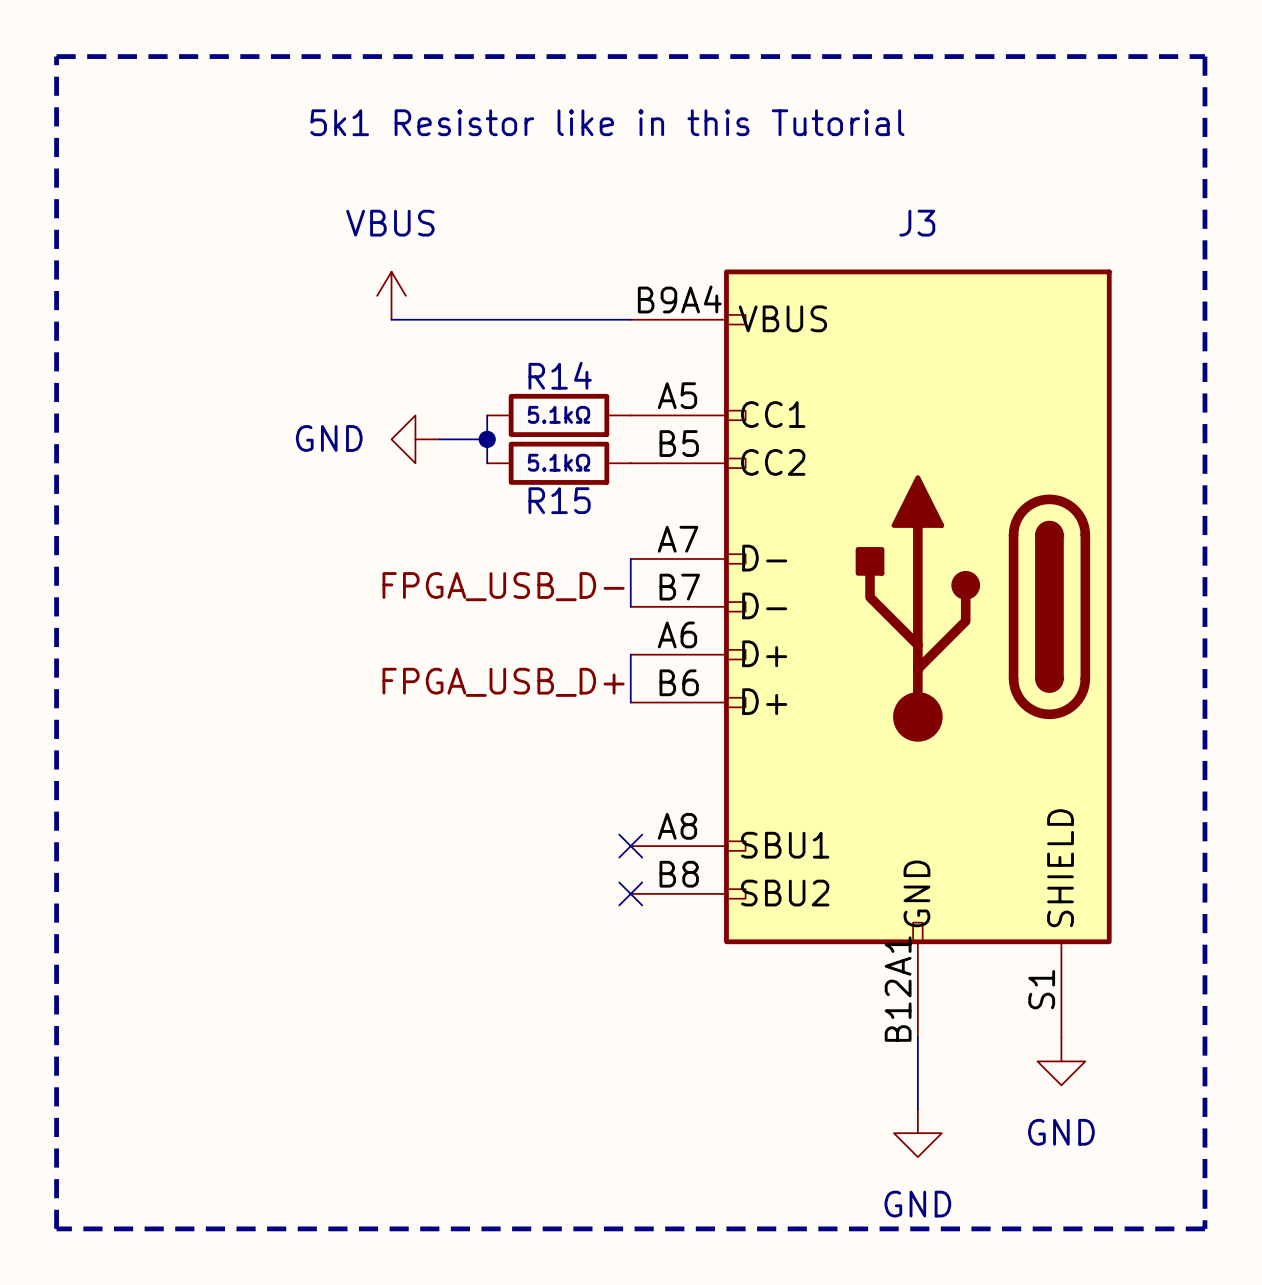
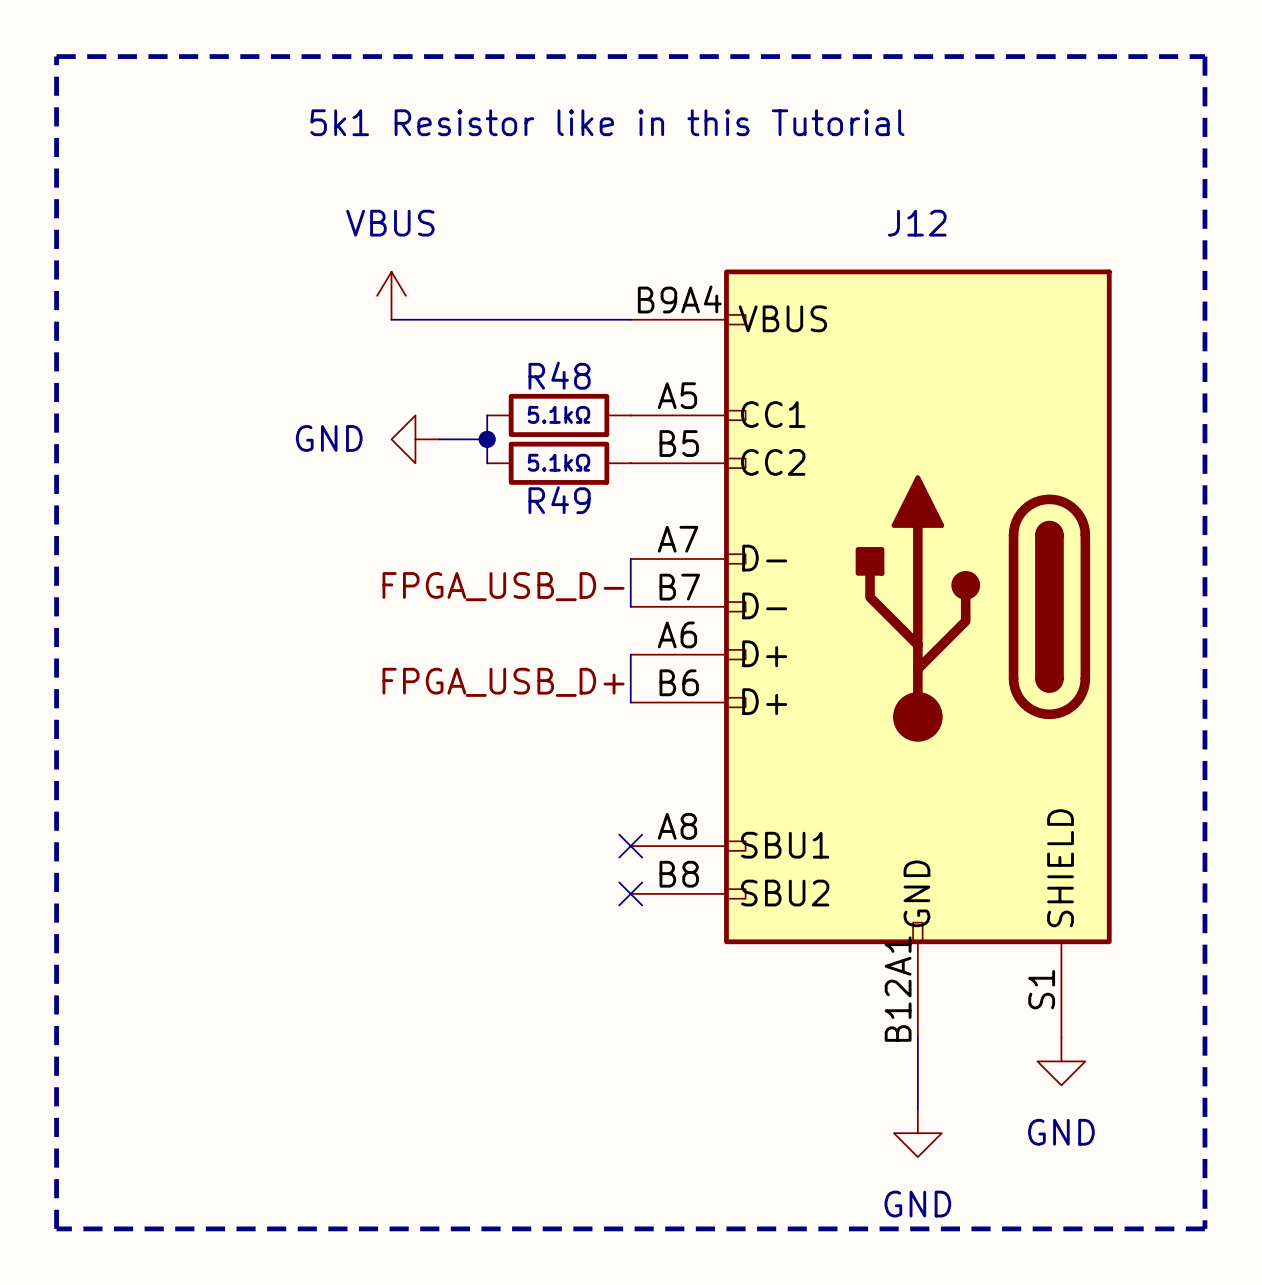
J3 name: J3 (917, 223) -> J12 (917, 223)
R14 name: R14 (560, 375) -> R48 (559, 375)
R15 name: R15 (559, 500) -> R49 (559, 500)

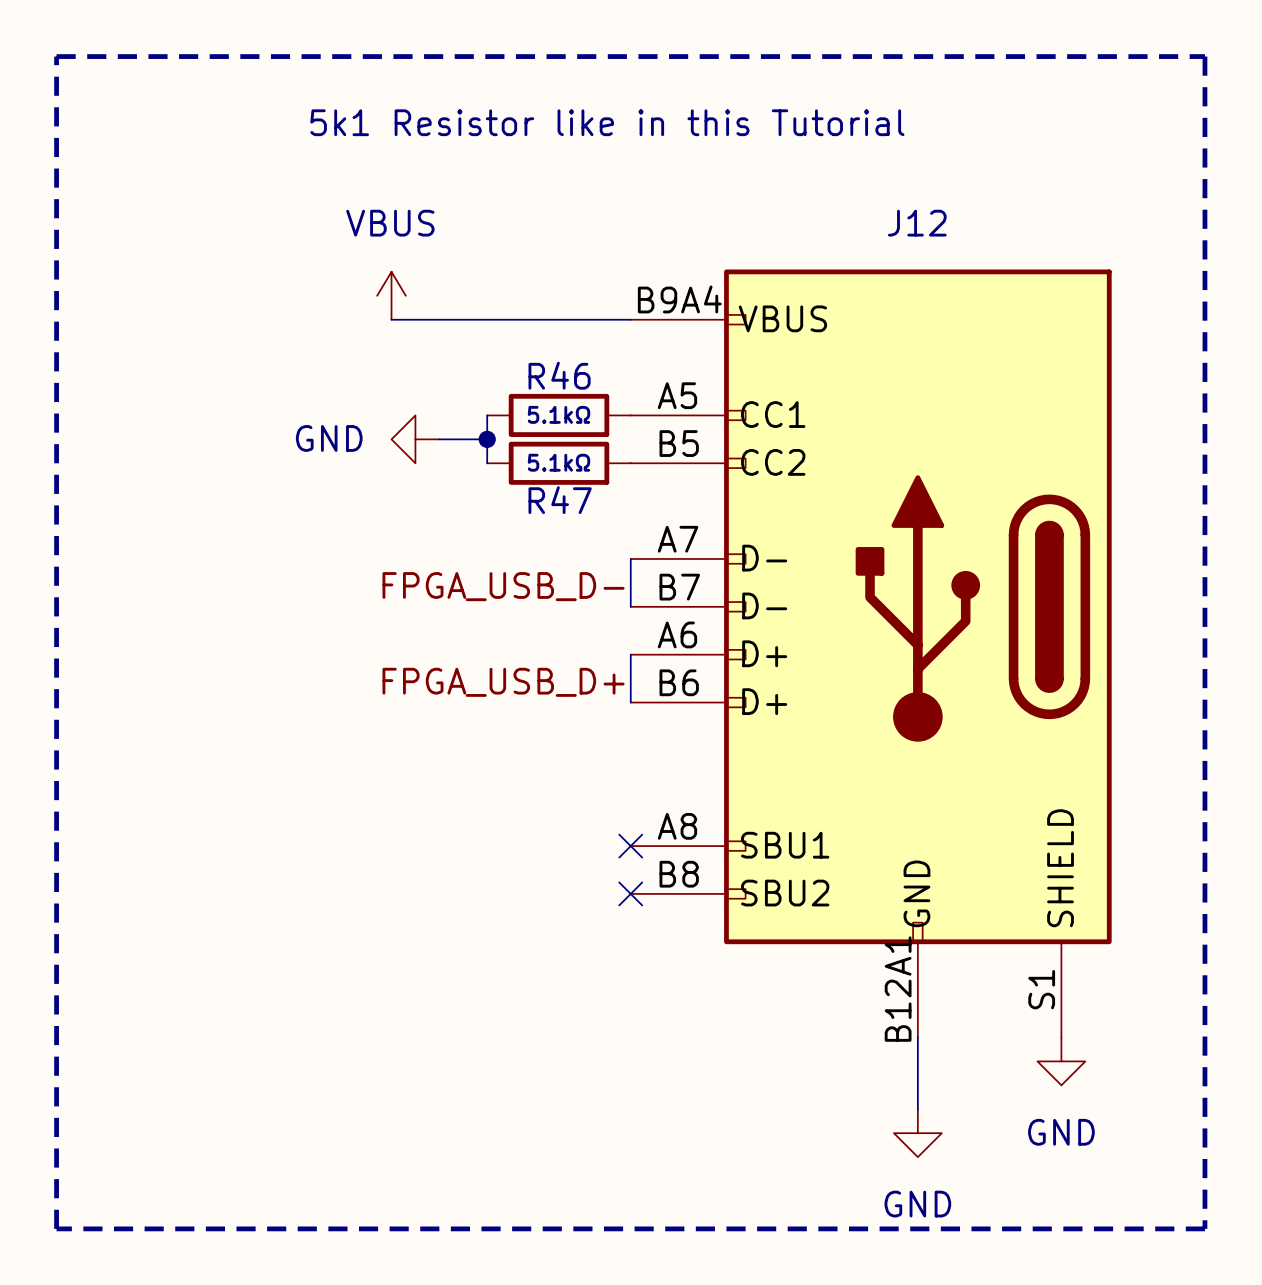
R48 name: R48 (559, 375) -> R46 (559, 375)
R49 name: R49 (559, 500) -> R47 (560, 500)

